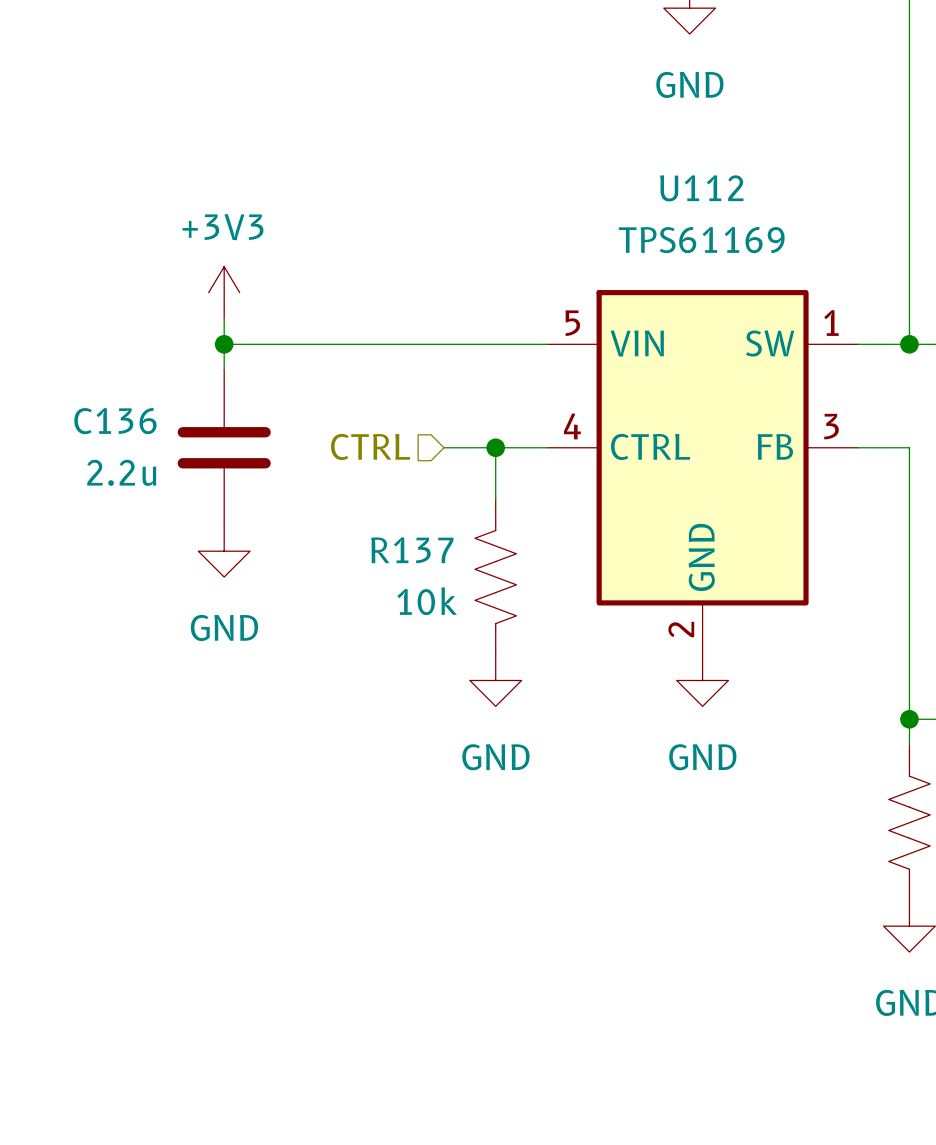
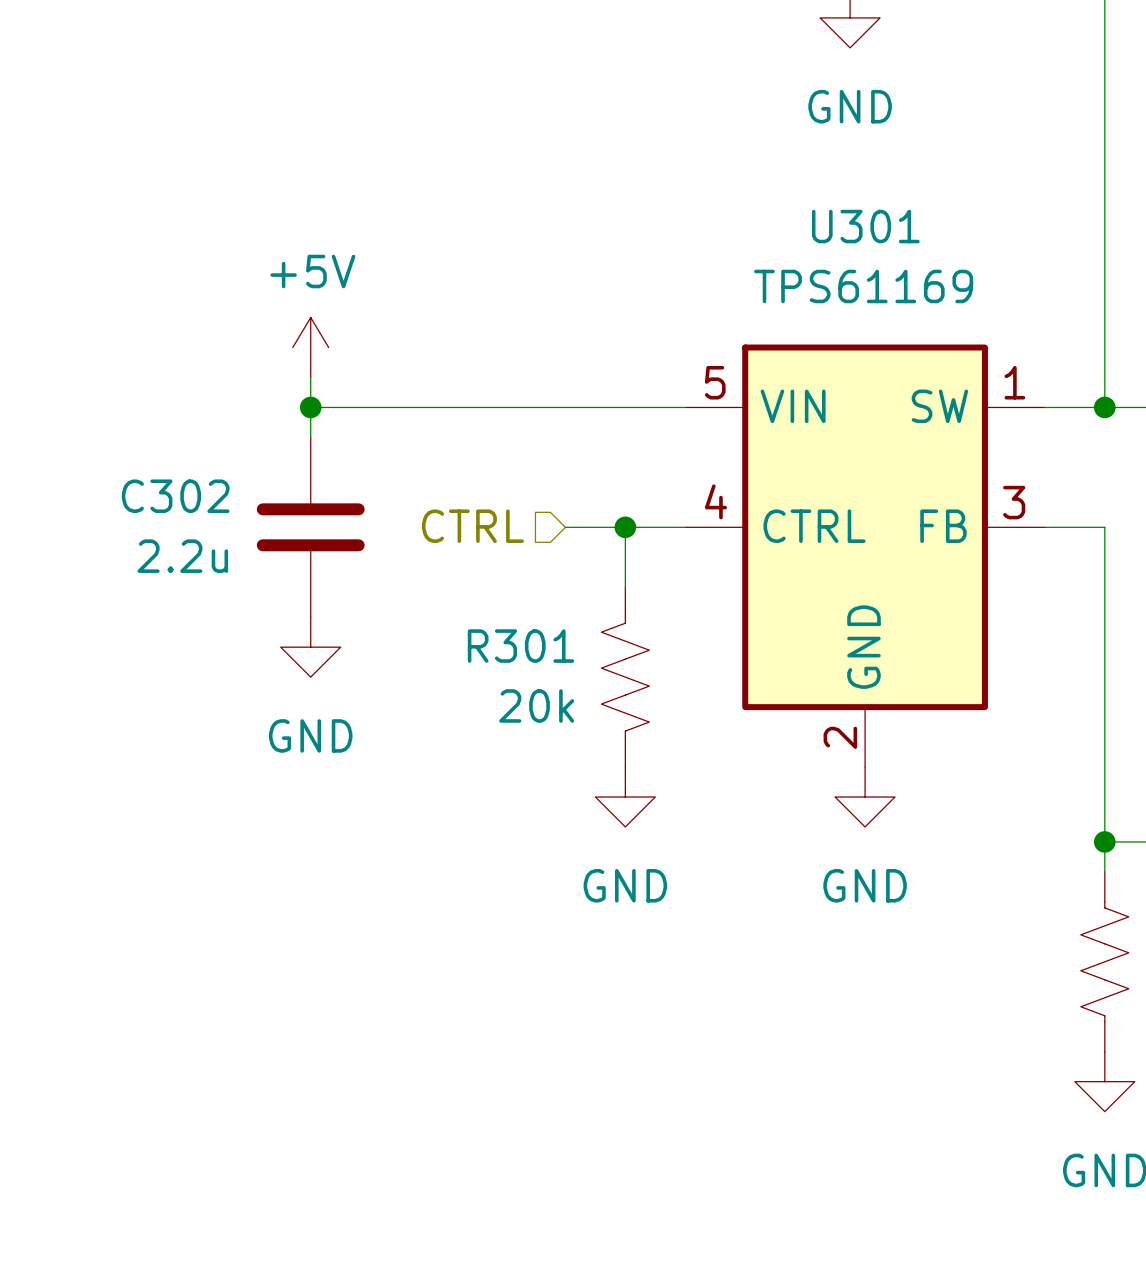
U112 name: U112 (701, 188) -> U301 (865, 226)
power symbol: +3V3 (224, 292) -> +5V (310, 347)
C136 name: C136 (115, 421) -> C302 (175, 496)
R137 name: R137 (412, 550) -> R301 (520, 646)
R137 value: 10k (427, 601) -> 20k (536, 705)

